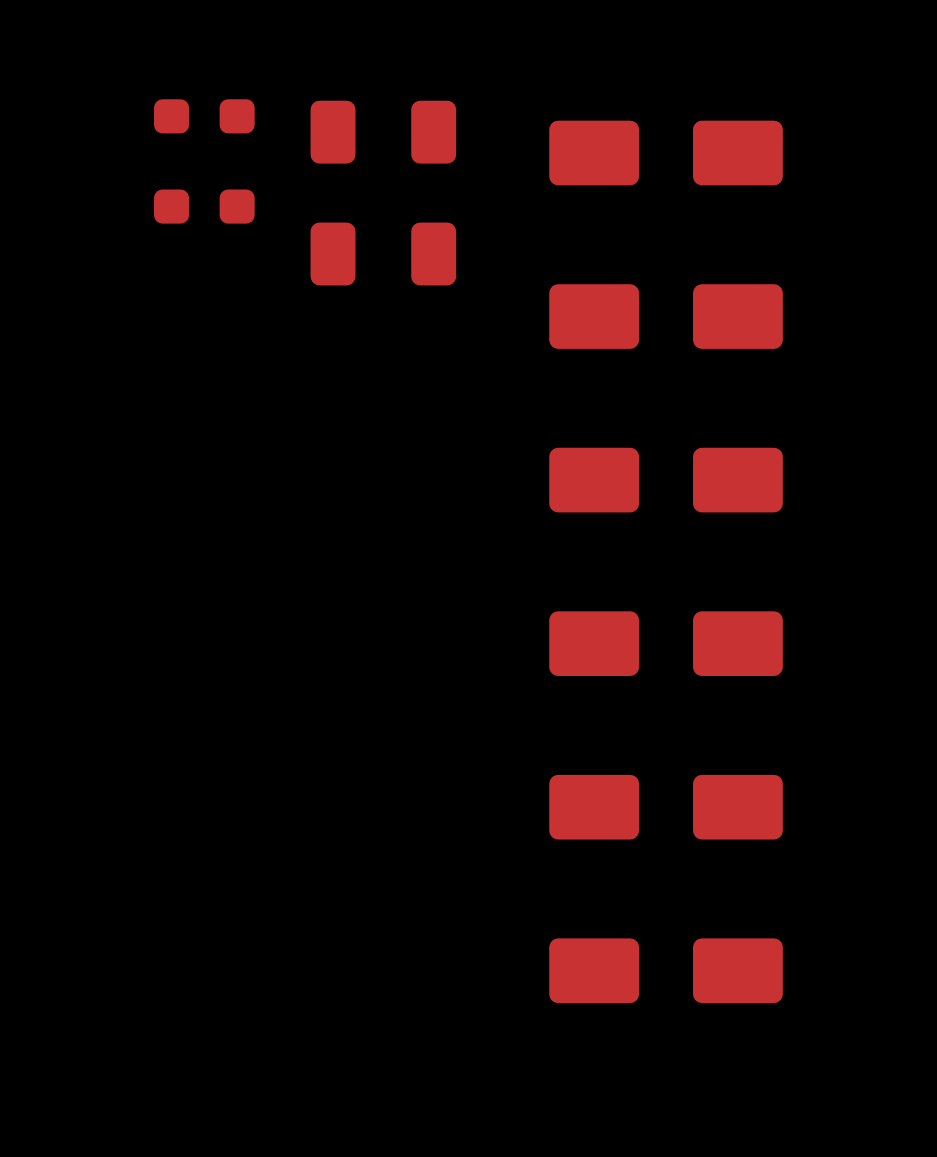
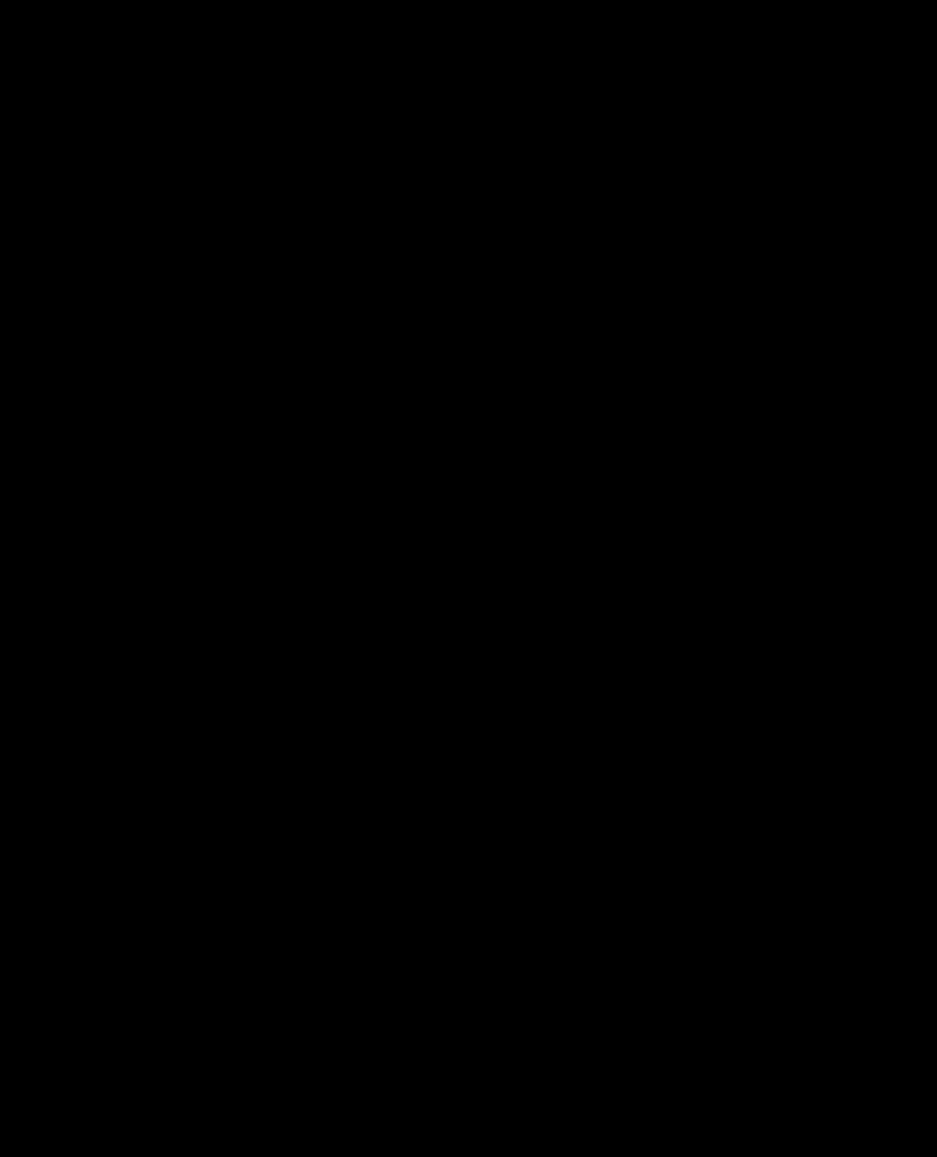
part: (204, 116) -> none
part: (383, 132) -> none
part: (666, 153) -> none
part: (204, 206) -> none
part: (383, 254) -> none
part: (666, 316) -> none
part: (666, 480) -> none
part: (666, 643) -> none
part: (666, 807) -> none
part: (666, 970) -> none

